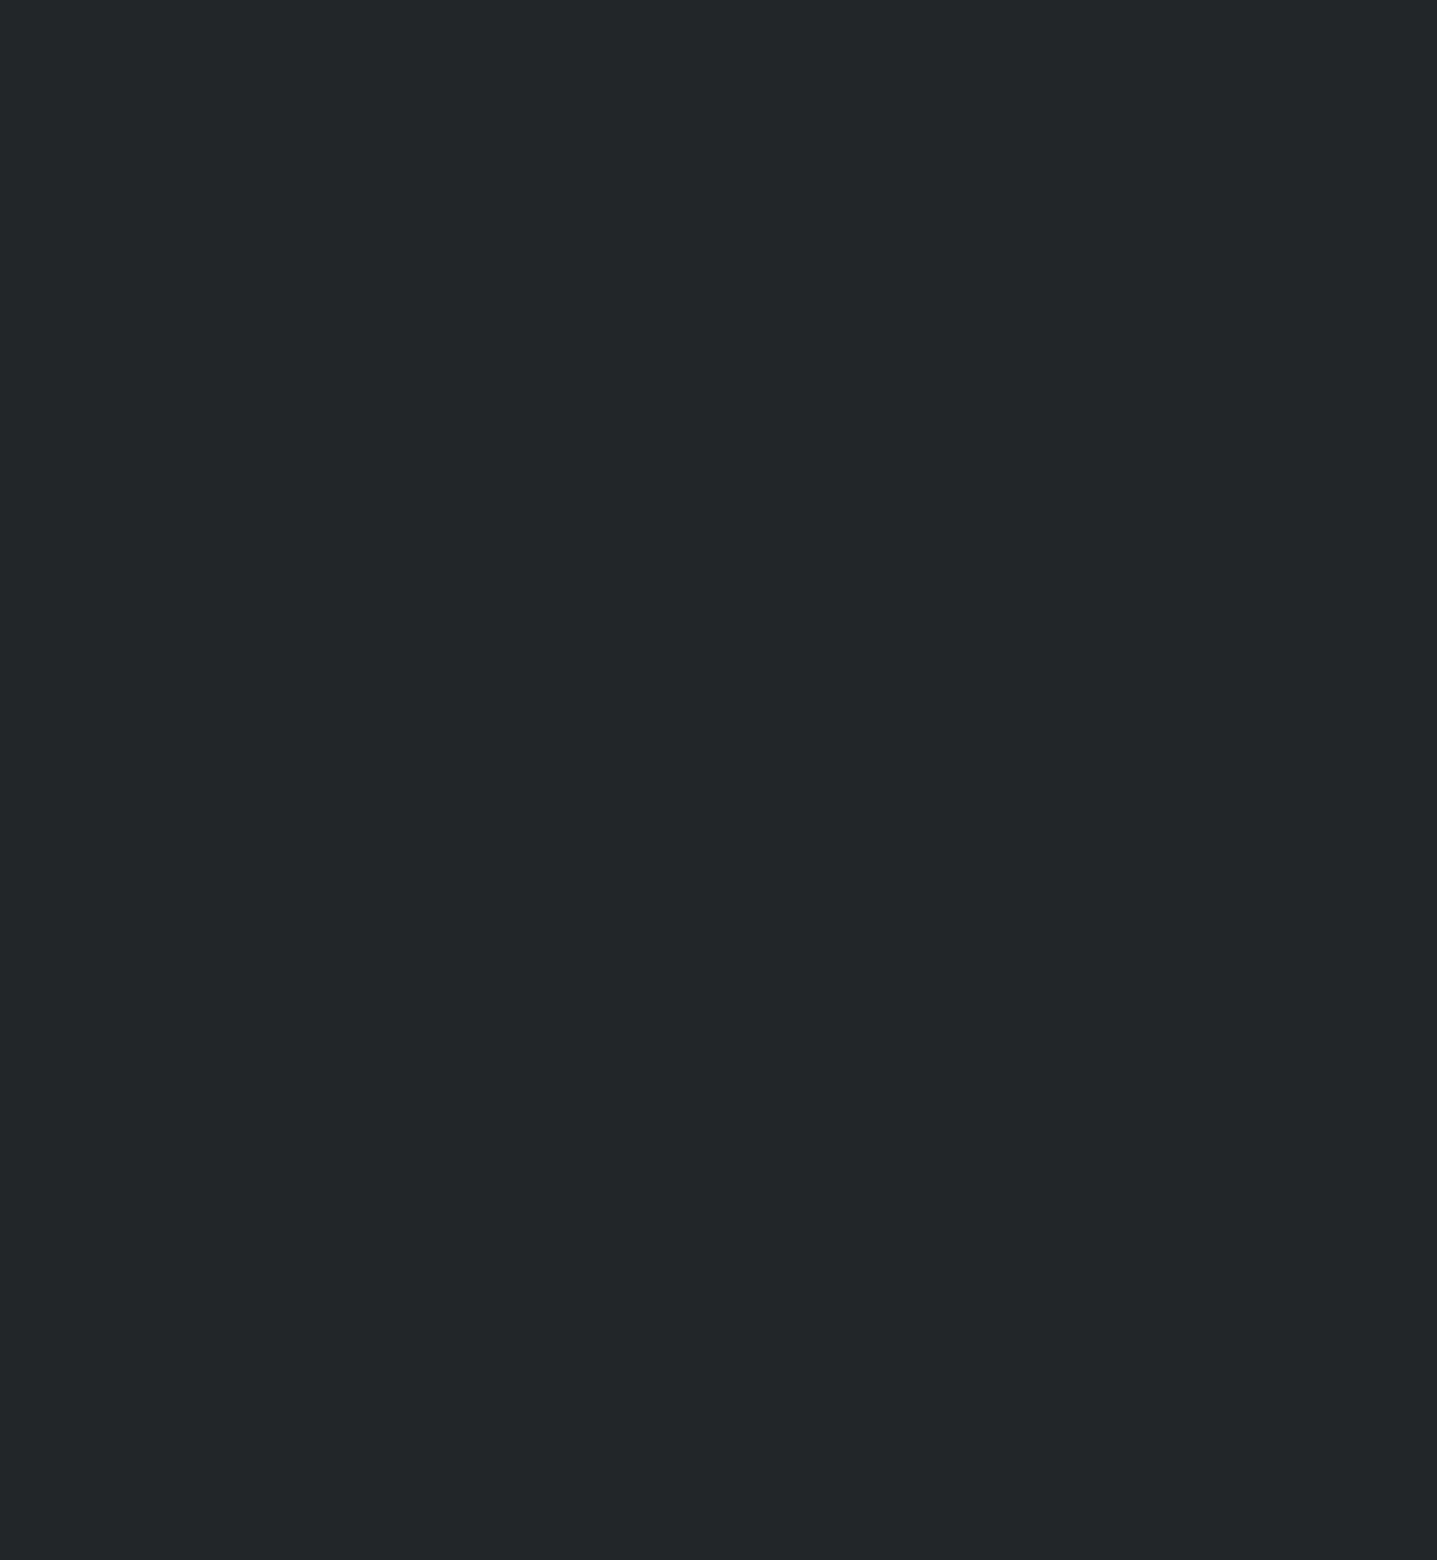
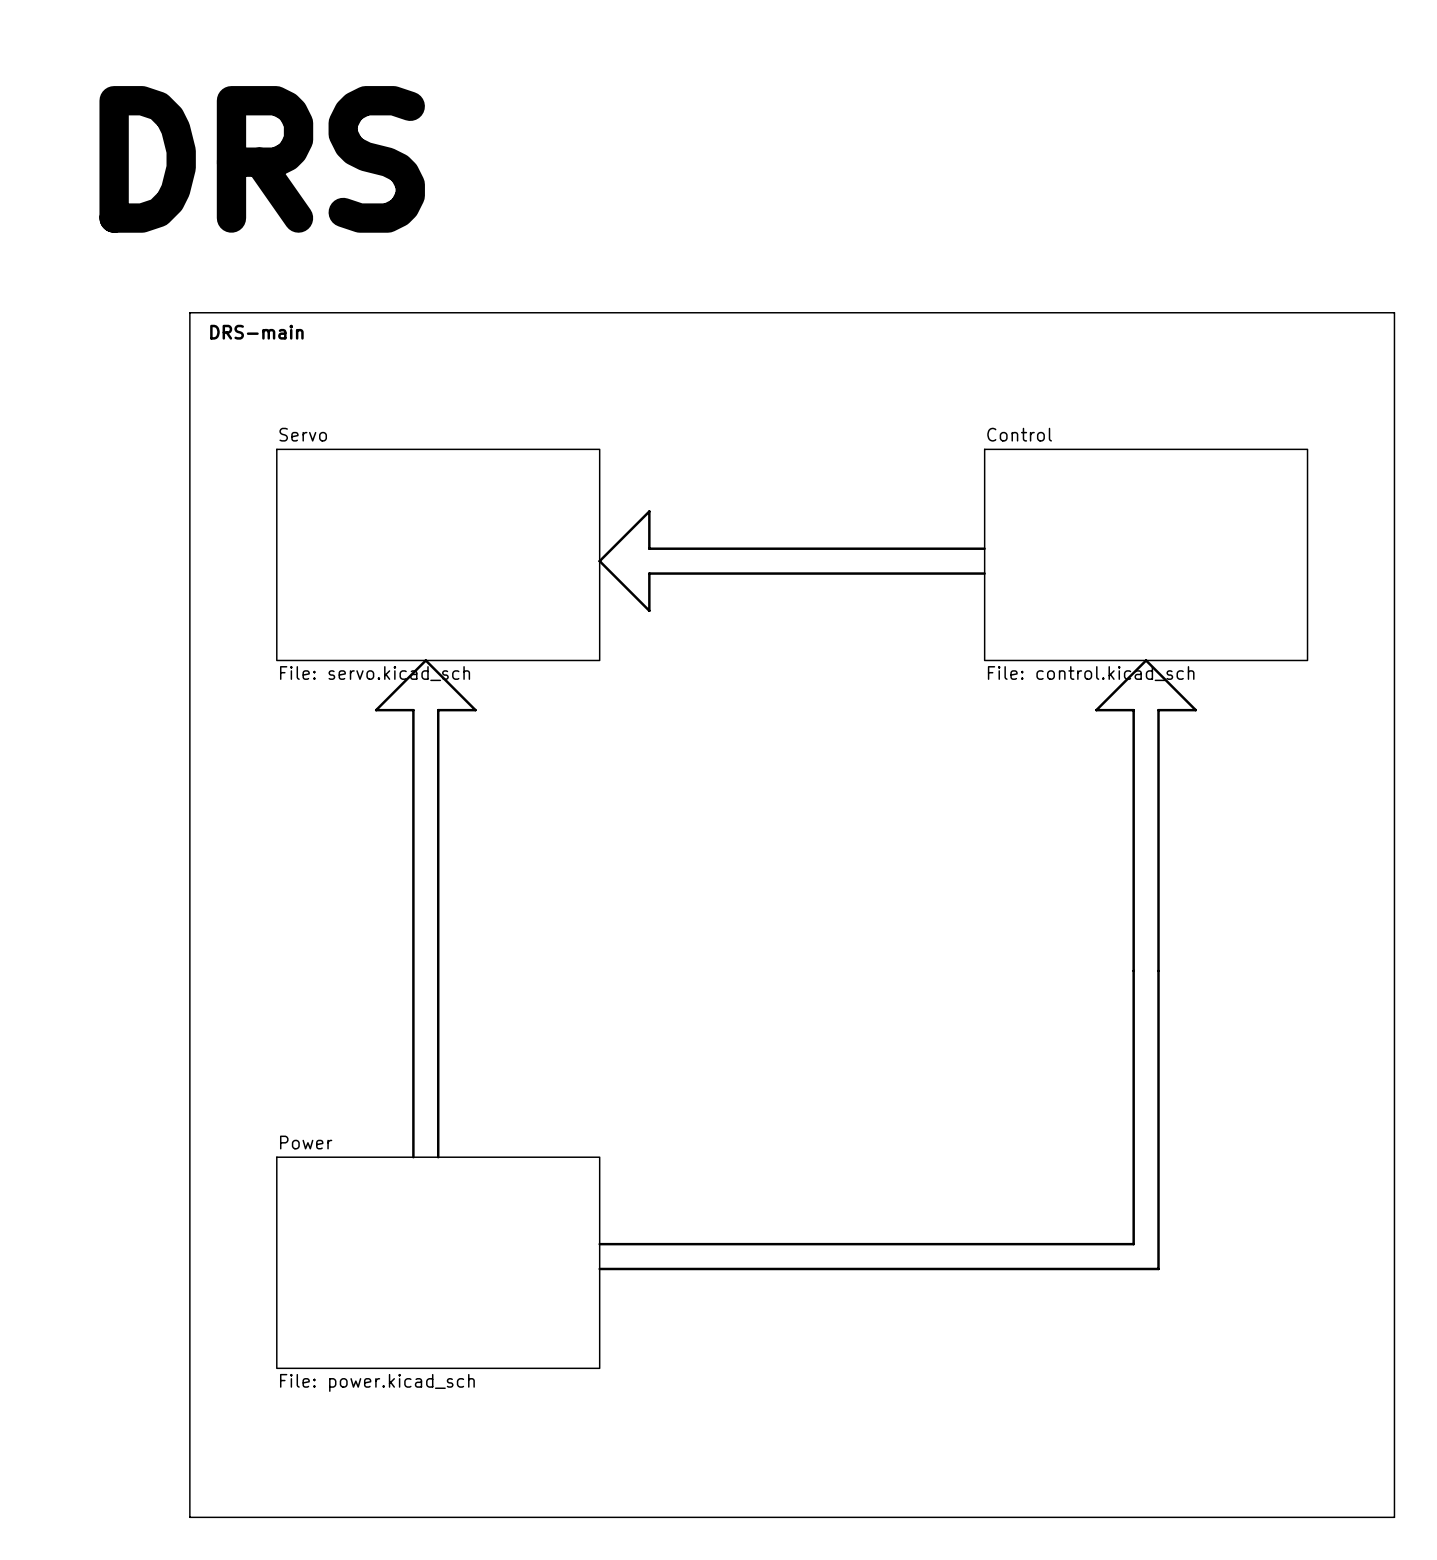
text: none -> DRS (262, 159)
line: none -> (189, 312) (1394, 312) (1394, 1517) (189, 1517) (189, 312)
text: none -> DRS-main (256, 332)
line: none -> (984, 548) (649, 548) (649, 511) (599, 561) (649, 610) (649, 573) (984, 573)
sheet Servo: none -> File: servo.kicad_sch (438, 554)
sheet Control: none -> File: control.kicad_sch (1146, 554)
line: none -> (413, 1157) (413, 710) (376, 710) (425, 660) (475, 710) (438, 710) (438, 1157)
line: none -> (599, 1244) (1133, 1244) (1133, 710) (1096, 710) (1146, 660) (1195, 710) (1158, 710) (1158, 1268) (599, 1268)
sheet Power: none -> File: power.kicad_sch (438, 1262)

